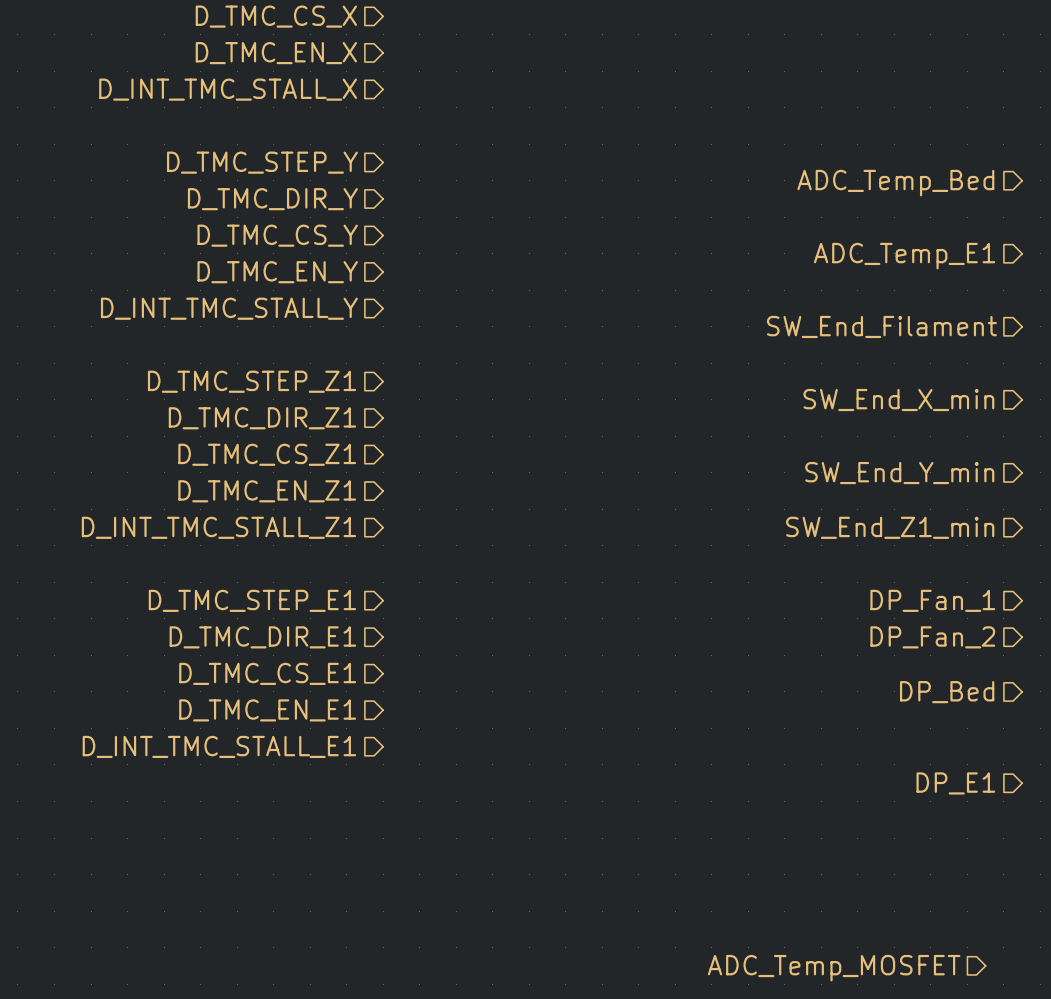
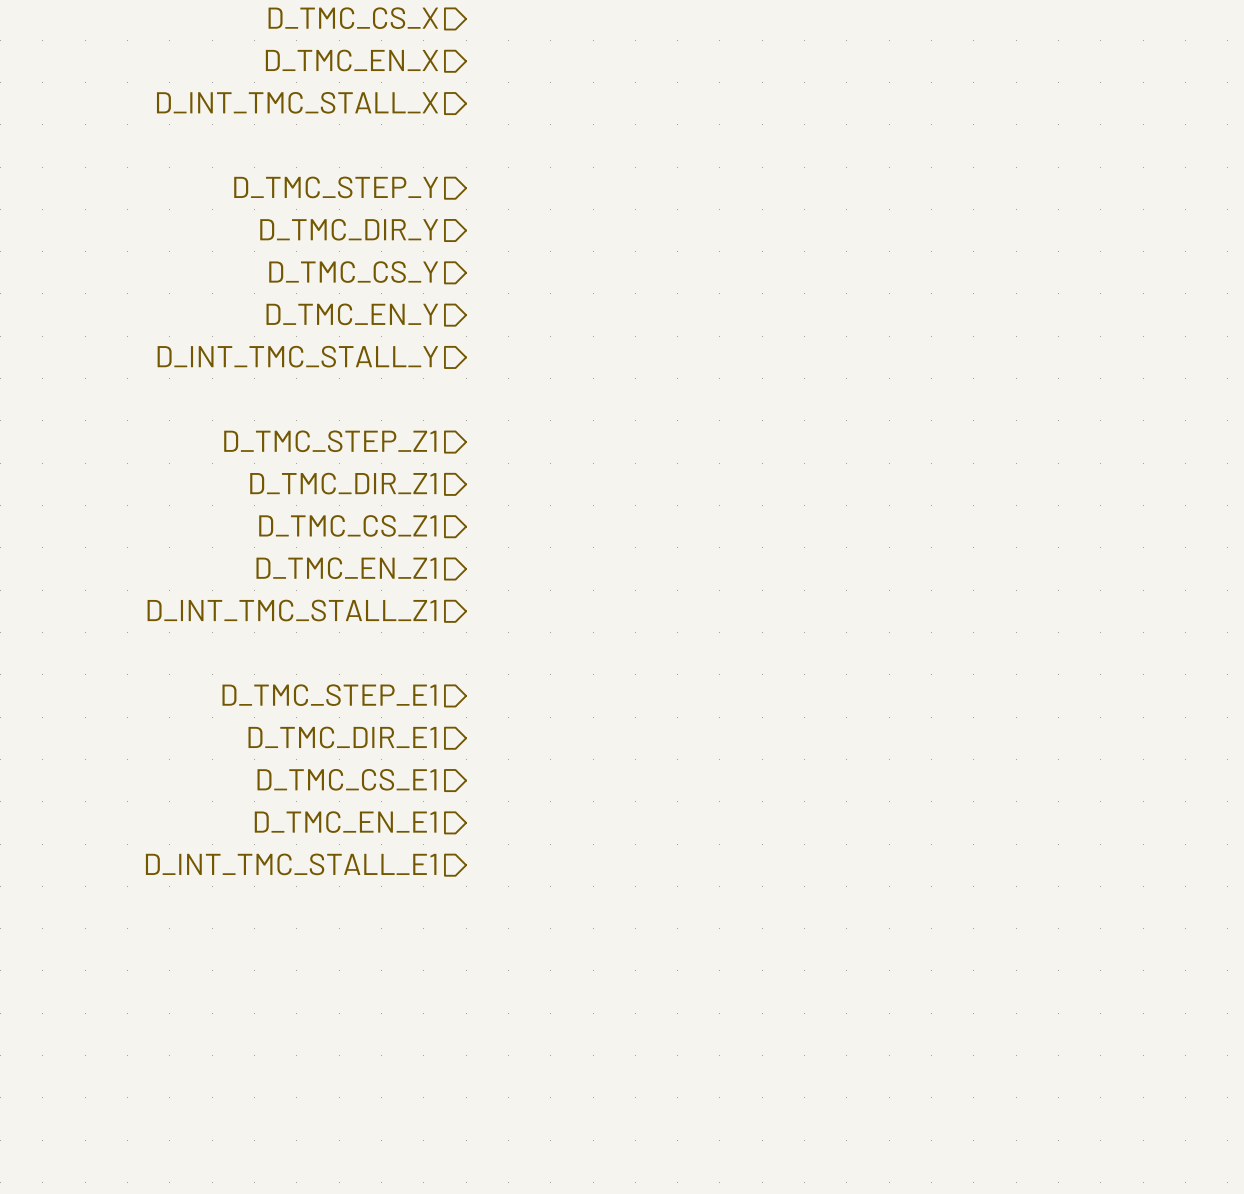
hierarchical label: ADC_Temp_Bed (895, 183) -> none
hierarchical label: ADC_Temp_E1 (904, 256) -> none
hierarchical label: SW_End_Filament (881, 326) -> none
hierarchical label: SW_End_X_min (898, 400) -> none
hierarchical label: SW_End_Y_min (899, 473) -> none
hierarchical label: SW_End_Z1_min (890, 527) -> none
hierarchical label: DP_Fan_1 (932, 600) -> none
hierarchical label: DP_Fan_2 (932, 637) -> none
hierarchical label: DP_Bed (947, 692) -> none
hierarchical label: DP_E1 (955, 783) -> none
hierarchical label: ADC_Temp_MOSFET (834, 968) -> none

